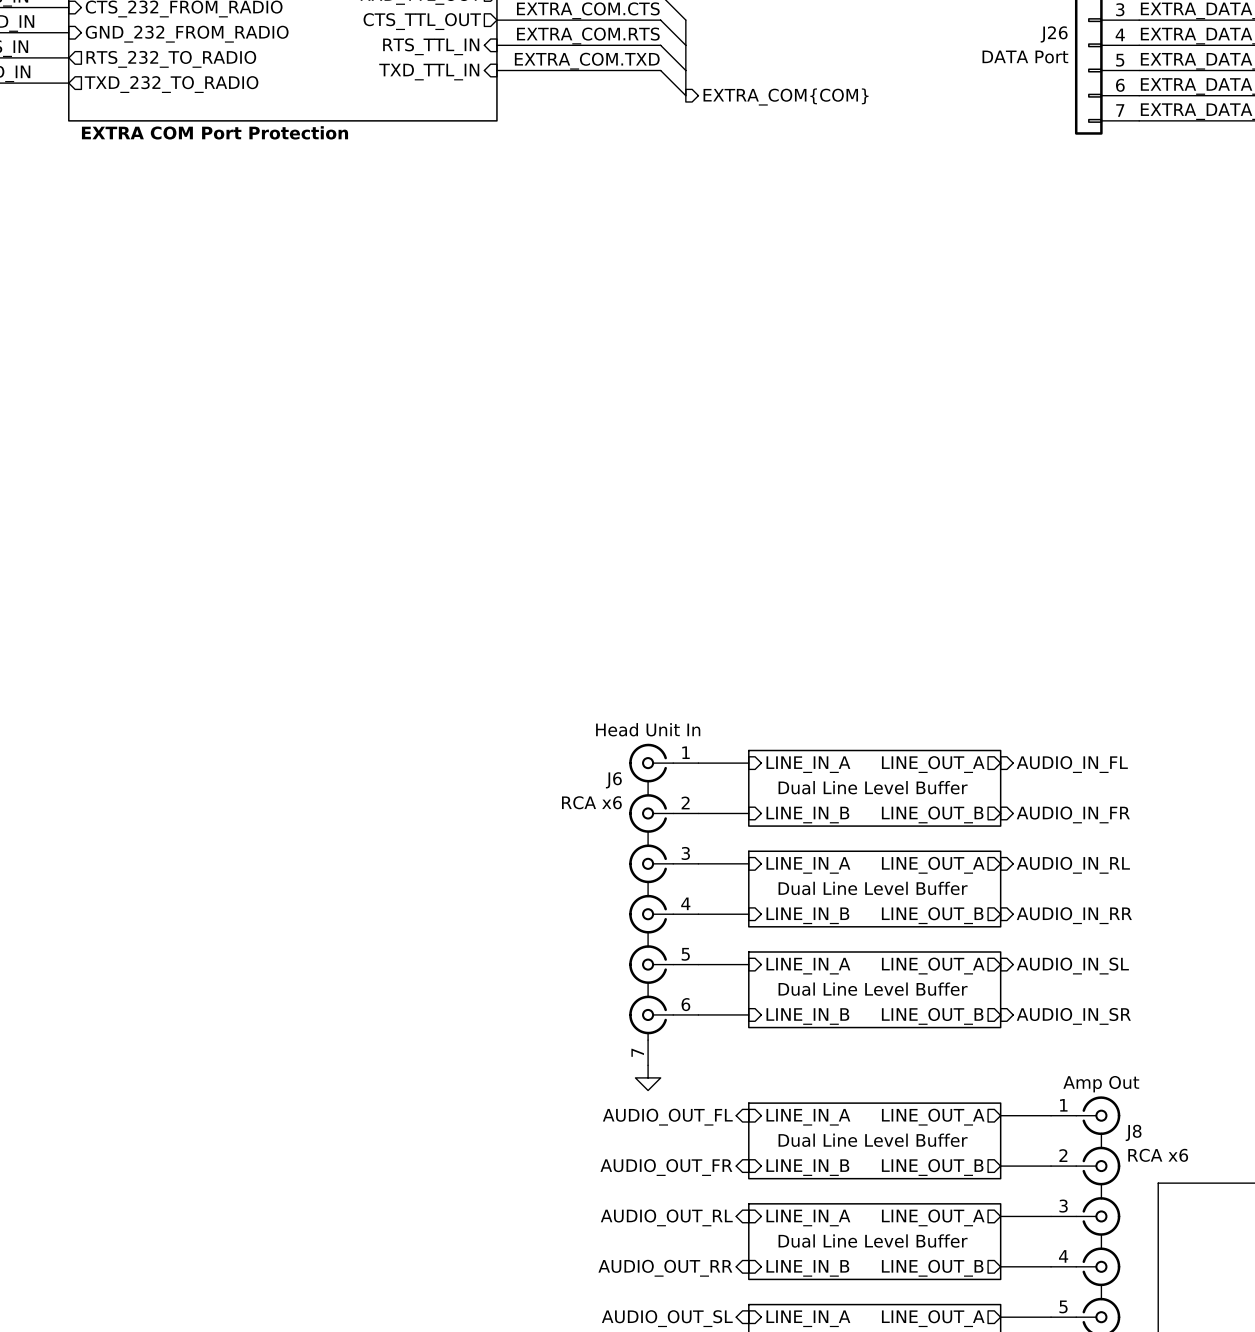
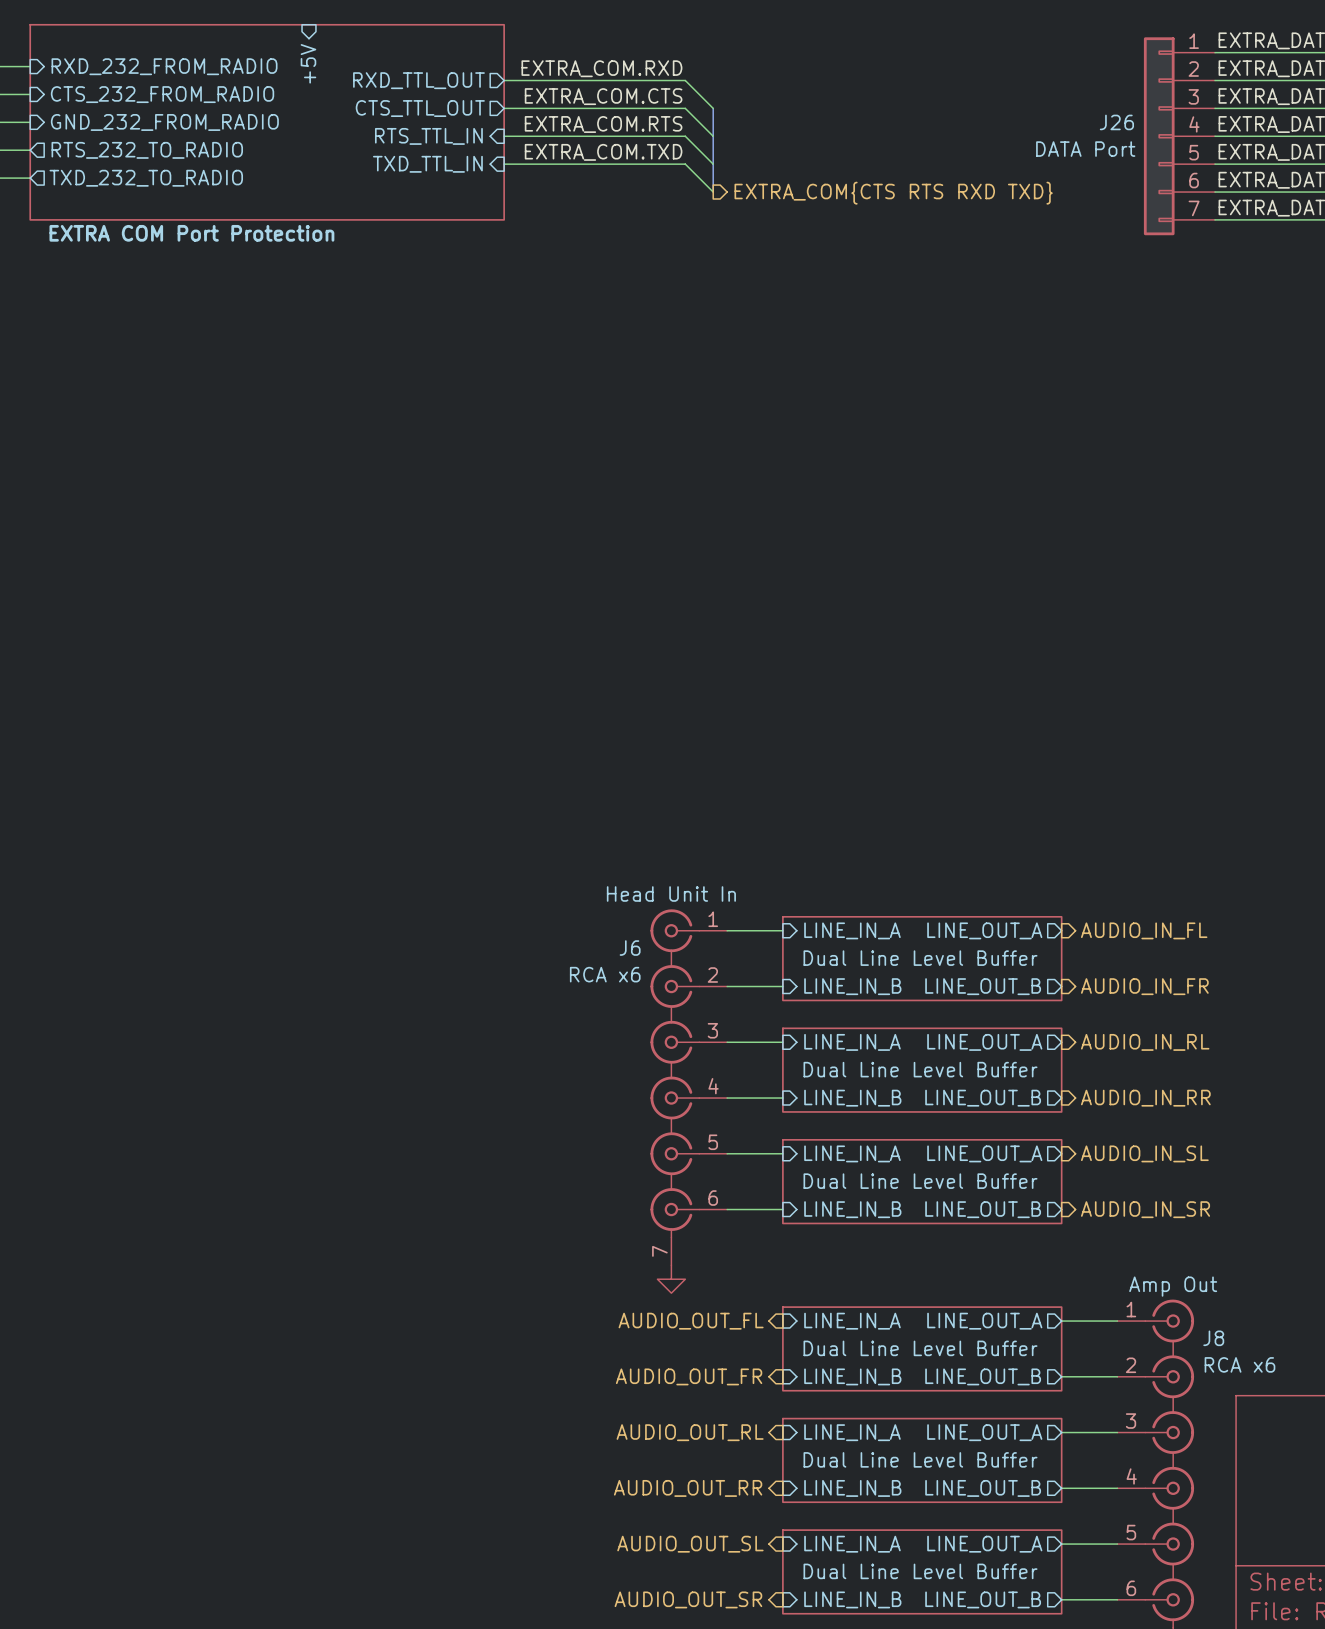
hierarchical label: EXTRA_COM{COM} (786, 96) -> EXTRA_COM{CTS RTS RXD TXD} (893, 193)

